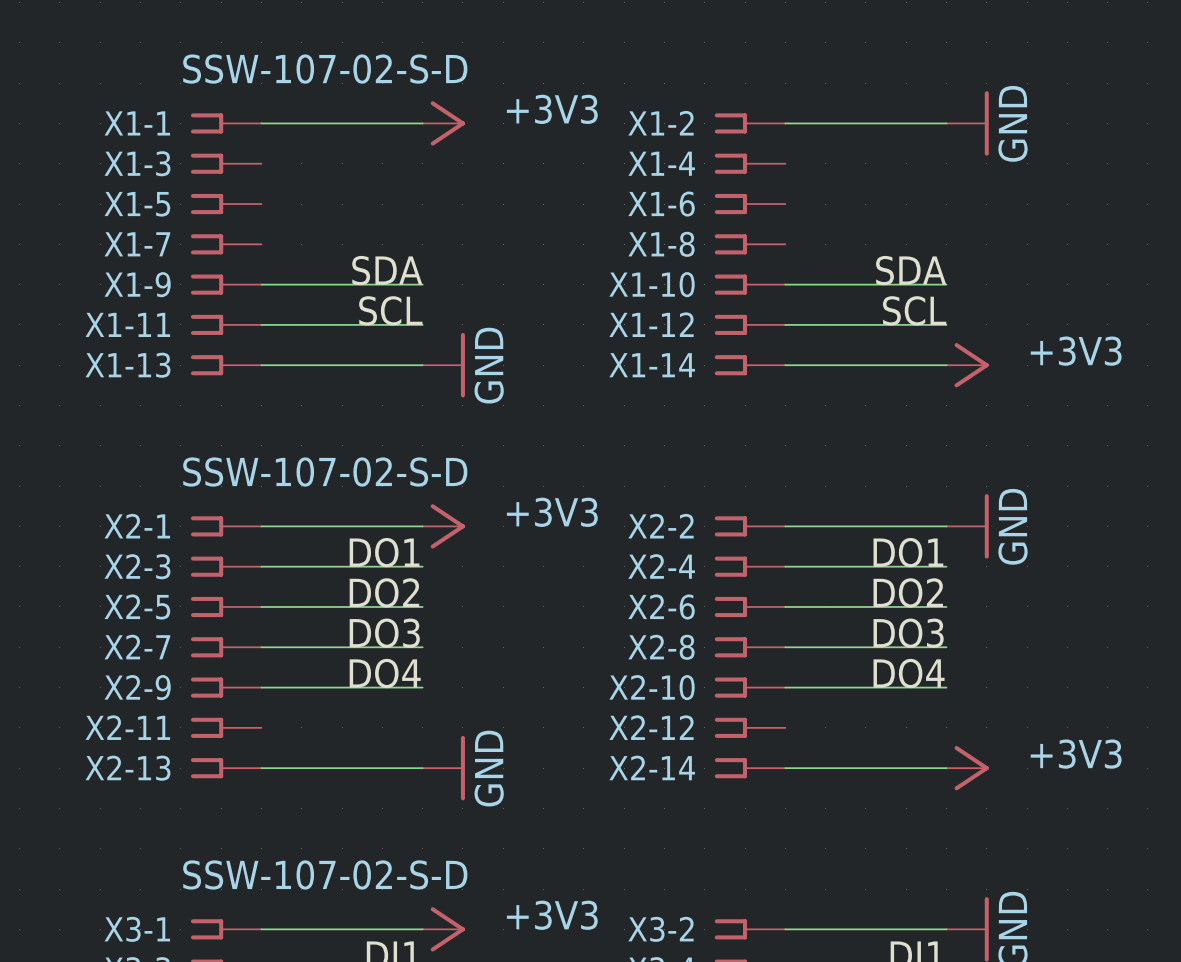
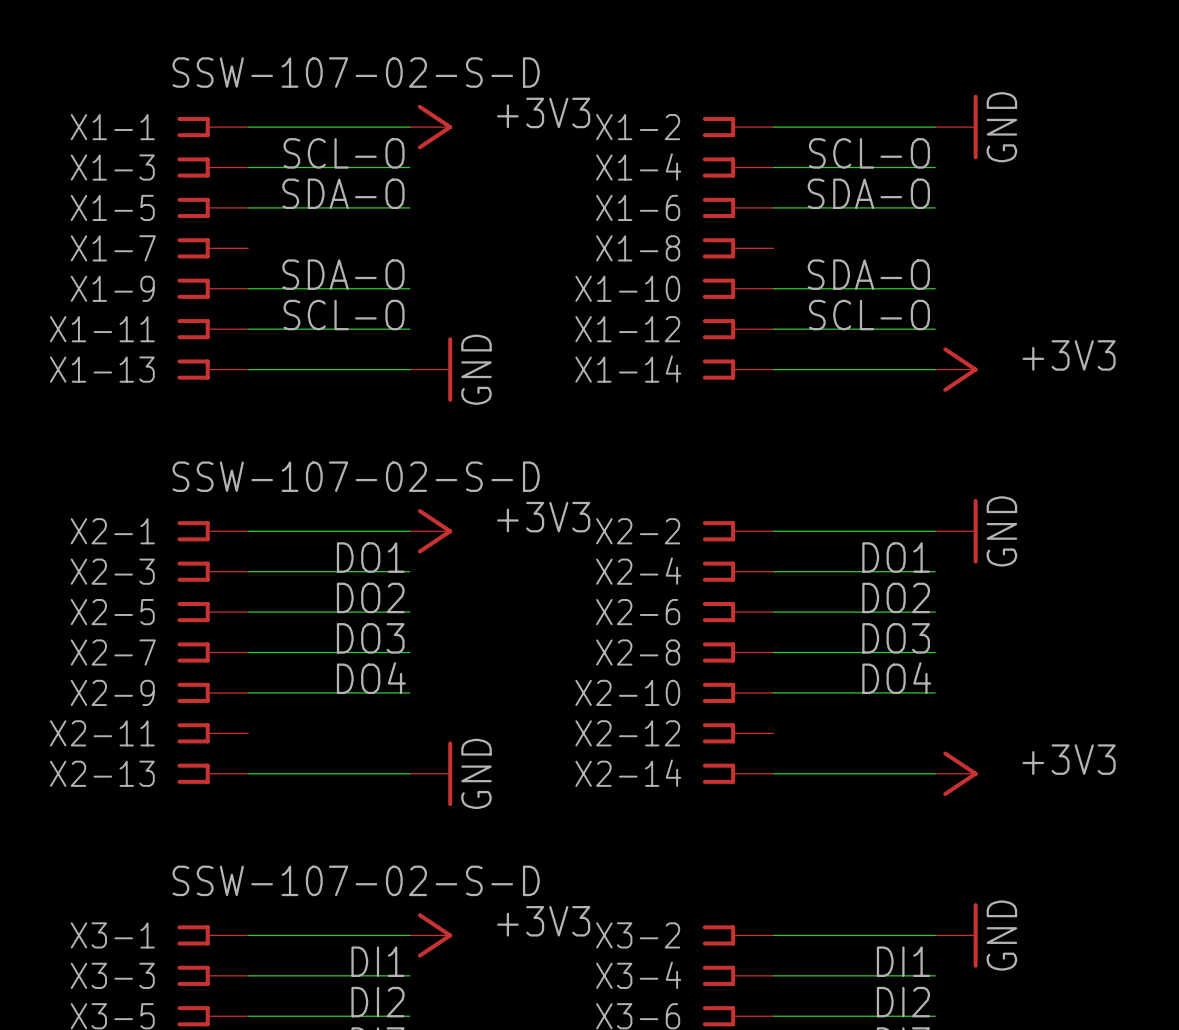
label: none -> SCL-O (344, 153)
label: none -> SCL-O (869, 153)
wire: none -> (248, 167) (409, 167)
wire: none -> (773, 167) (935, 167)
label: none -> SDA-O (343, 193)
label: none -> SDA-O (868, 193)
wire: none -> (248, 207) (409, 207)
wire: none -> (773, 207) (935, 207)
label: SDA (387, 270) -> SDA-O (343, 274)
label: SDA (911, 270) -> SDA-O (868, 274)
label: SCL (390, 310) -> SCL-O (344, 315)
label: SCL (914, 310) -> SCL-O (869, 315)

